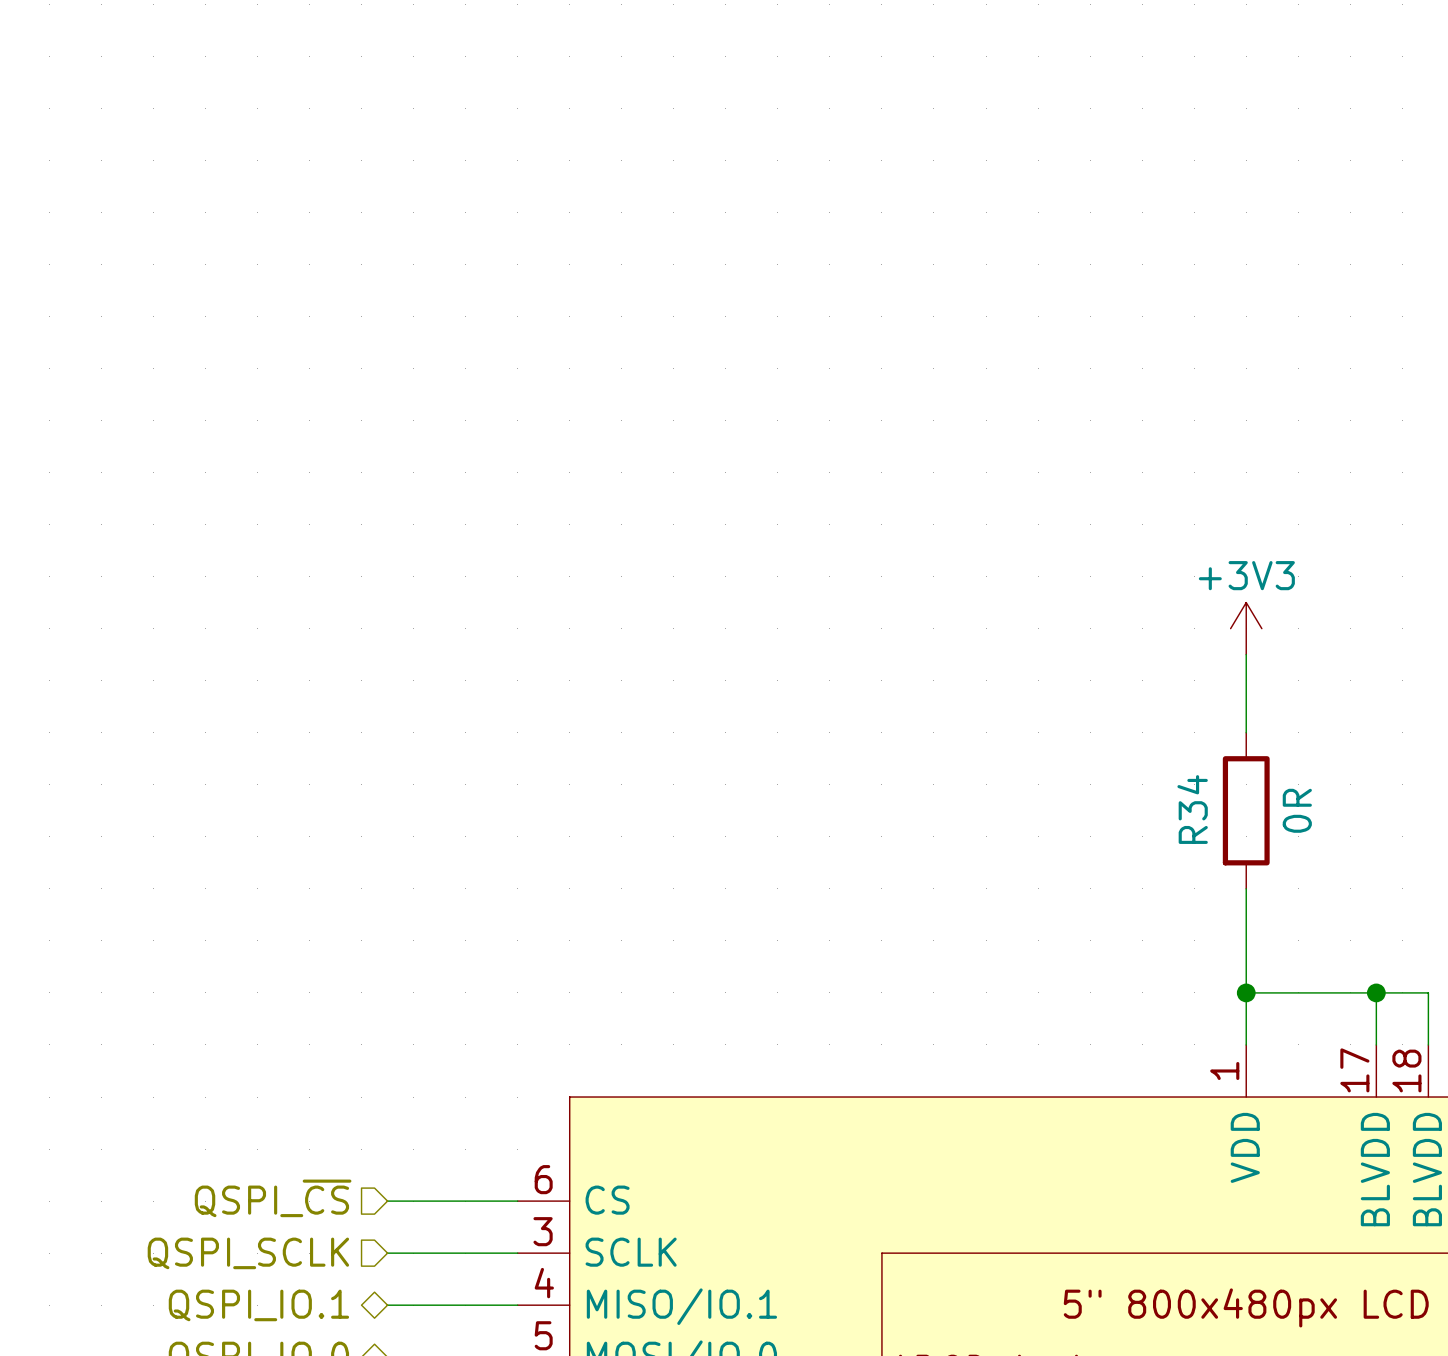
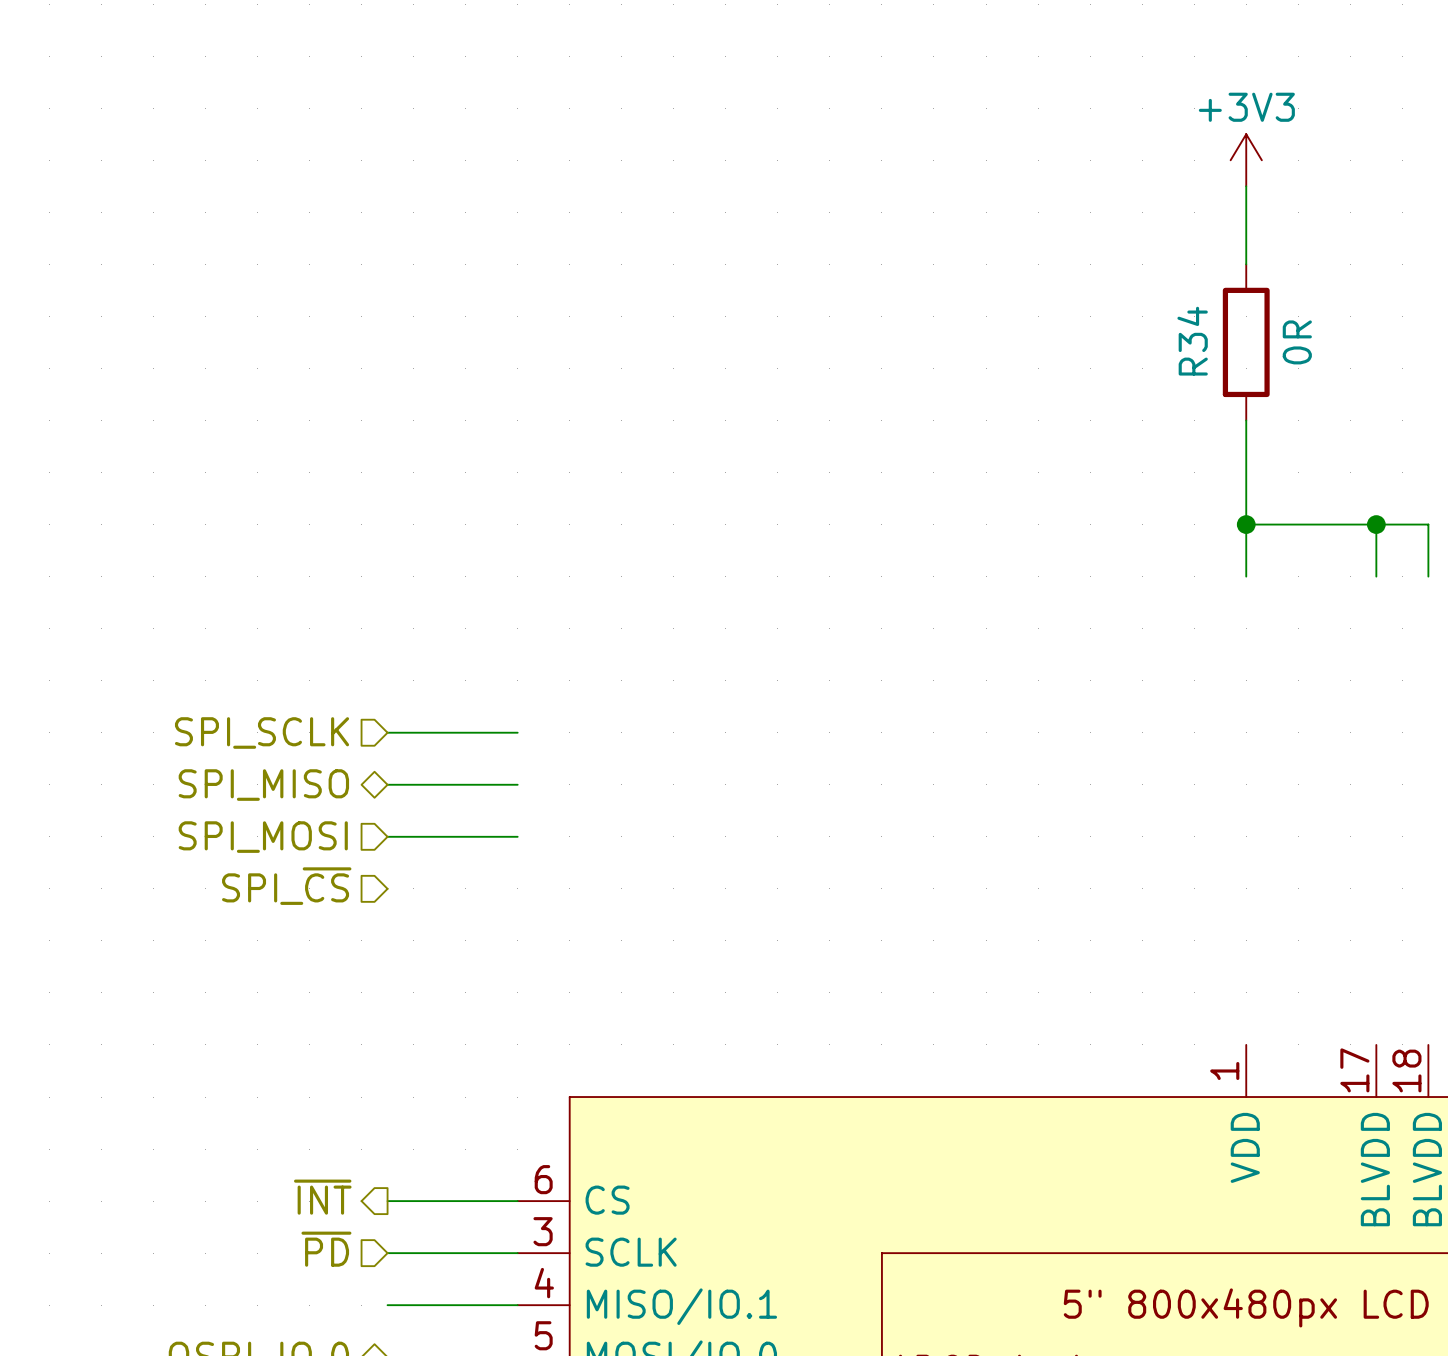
junction: none -> (1246, 524)
junction: none -> (1376, 524)
power symbol position: +3V3 (1246, 628) -> +3V3 (1246, 160)
wire: (1246, 654) (1246, 732) -> (1246, 186) (1246, 264)
hierarchical label: none -> SPI_SCLK (262, 732)
wire: none -> (387, 732) (517, 732)
wire: none -> (387, 784) (517, 784)
hierarchical label: none -> SPI_MISO (263, 785)
R34 position: (1246, 810) -> (1246, 342)
wire: none -> (387, 836) (517, 836)
hierarchical label: none -> SPI_MOSI (263, 837)
hierarchical label: none -> SPI_~{CS} (286, 886)
wire: (1246, 888) (1246, 1044) -> (1246, 420) (1246, 576)
wire: (1246, 992) (1428, 992) (1428, 1044) -> (1246, 524) (1428, 524) (1428, 576)
junction: (1246, 992) -> none
wire: (1376, 992) (1376, 1044) -> (1376, 524) (1376, 576)
junction: (1376, 992) -> none
hierarchical label shape: input (273, 1198) -> output (322, 1197)
hierarchical label: QSPI_~{CS} (273, 1198) -> ~{INT} (322, 1197)
hierarchical label: QSPI_SCLK (248, 1253) -> ~{PD} (326, 1249)
hierarchical label: QSPI_IO.1 (258, 1305) -> none

